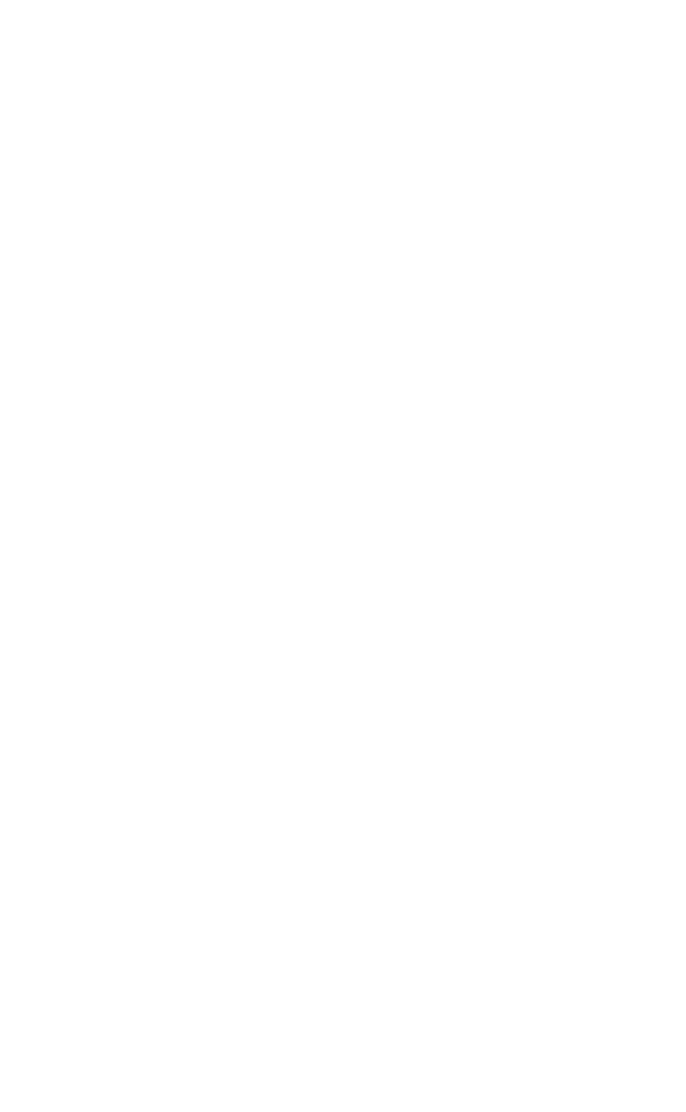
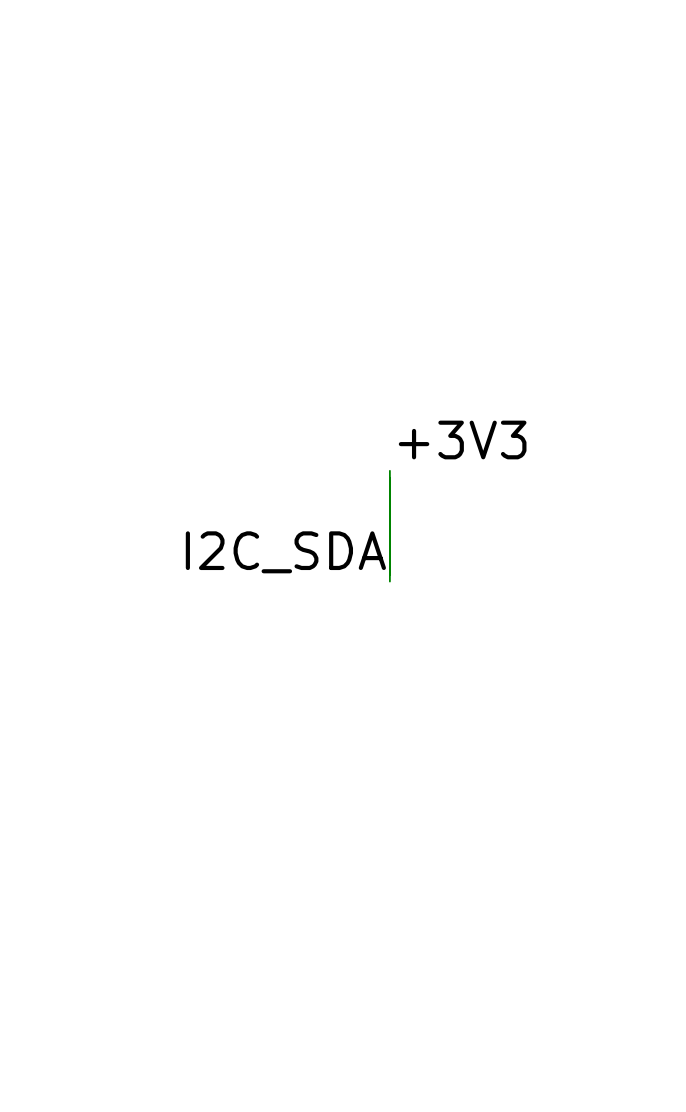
label: none -> +3V3 (462, 439)
wire: none -> (389, 470) (389, 581)
label: none -> I2C_SDA (285, 552)

